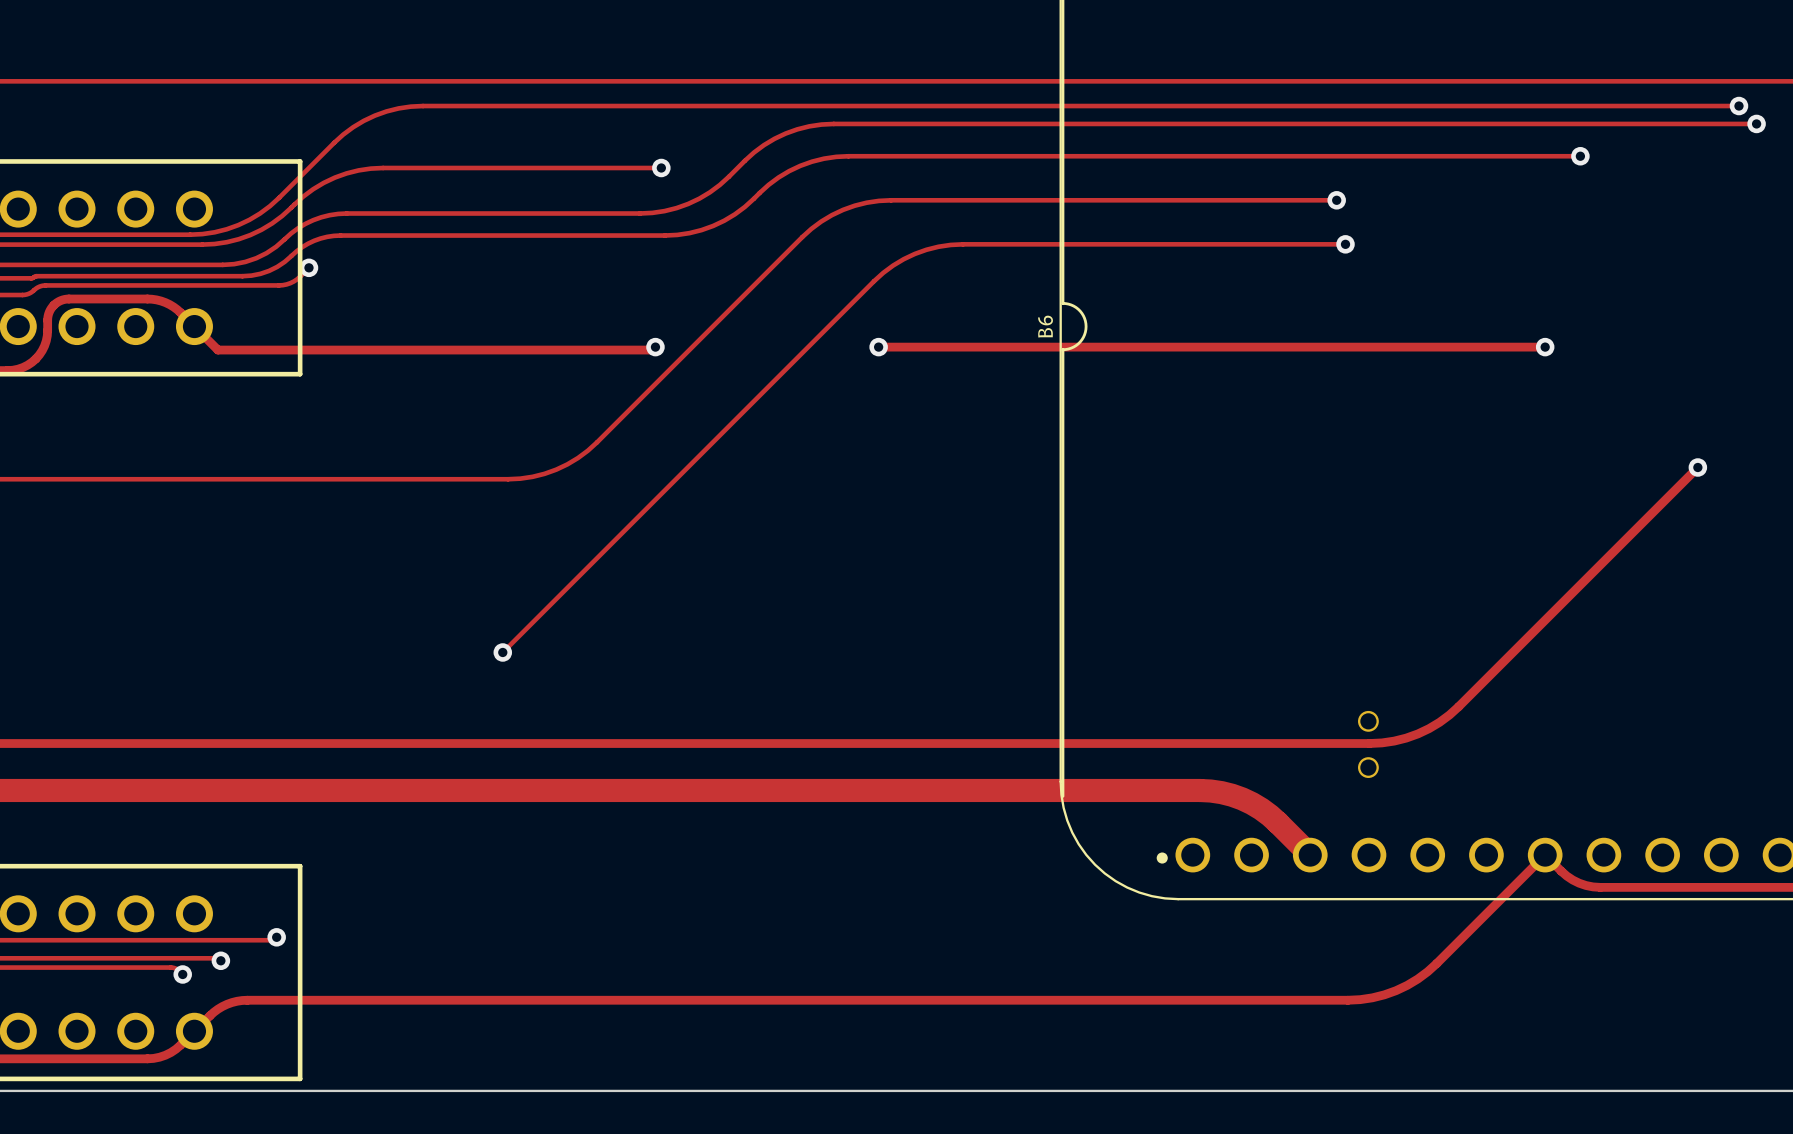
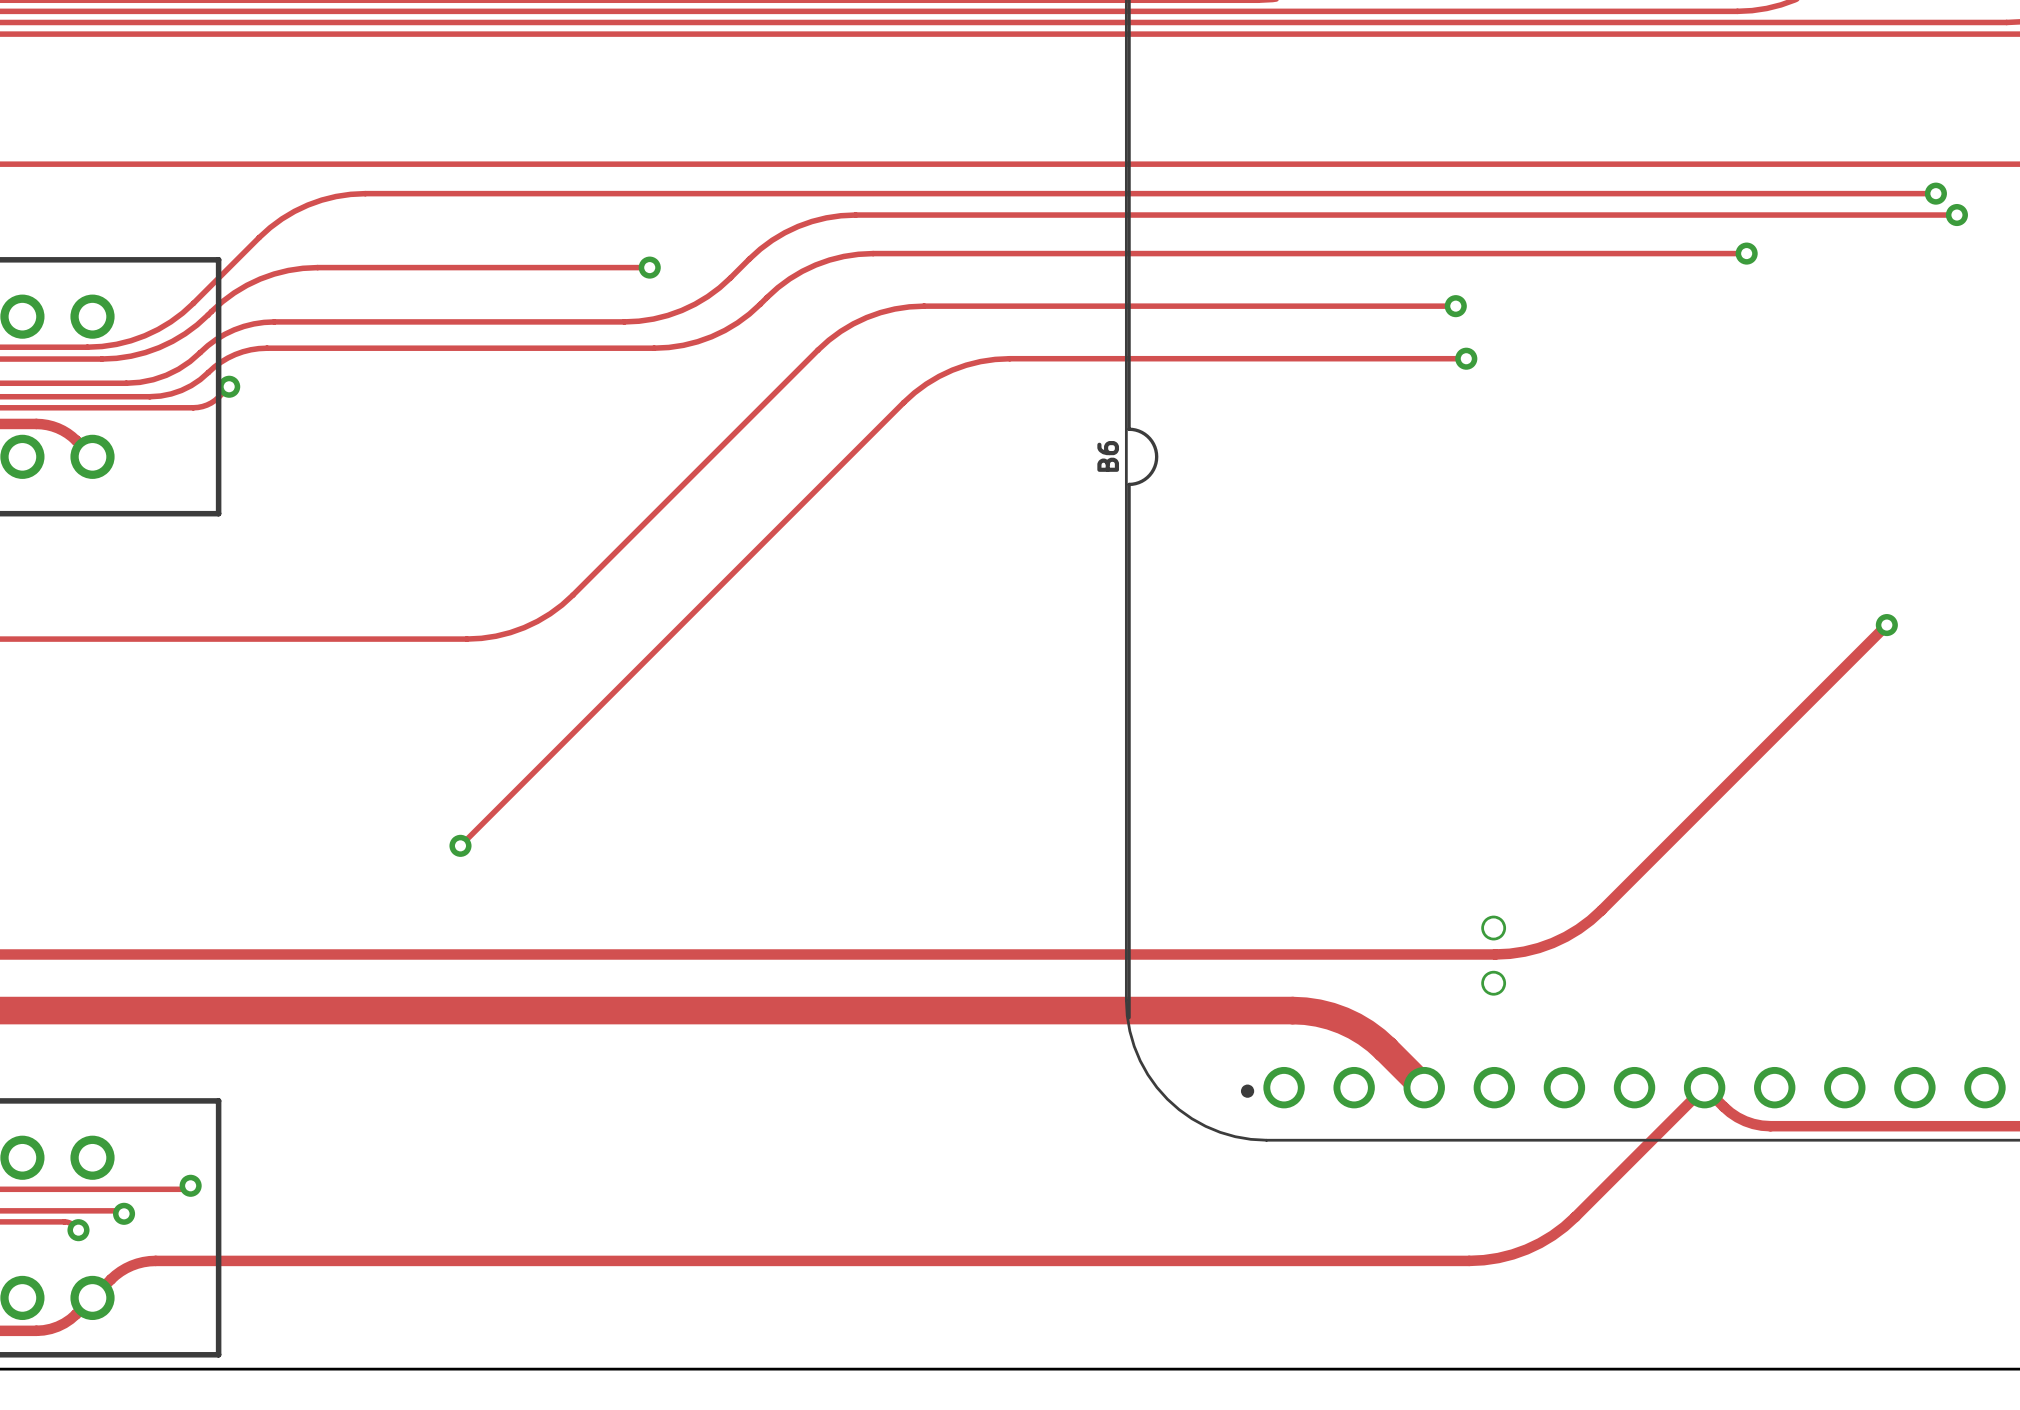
track: (194, 326) (217, 350) (652, 350) (655, 347) -> none
via: (655, 347) -> none
track: (878, 347) (1545, 347) -> none
via: (878, 347) -> none
via: (1545, 347) -> none

